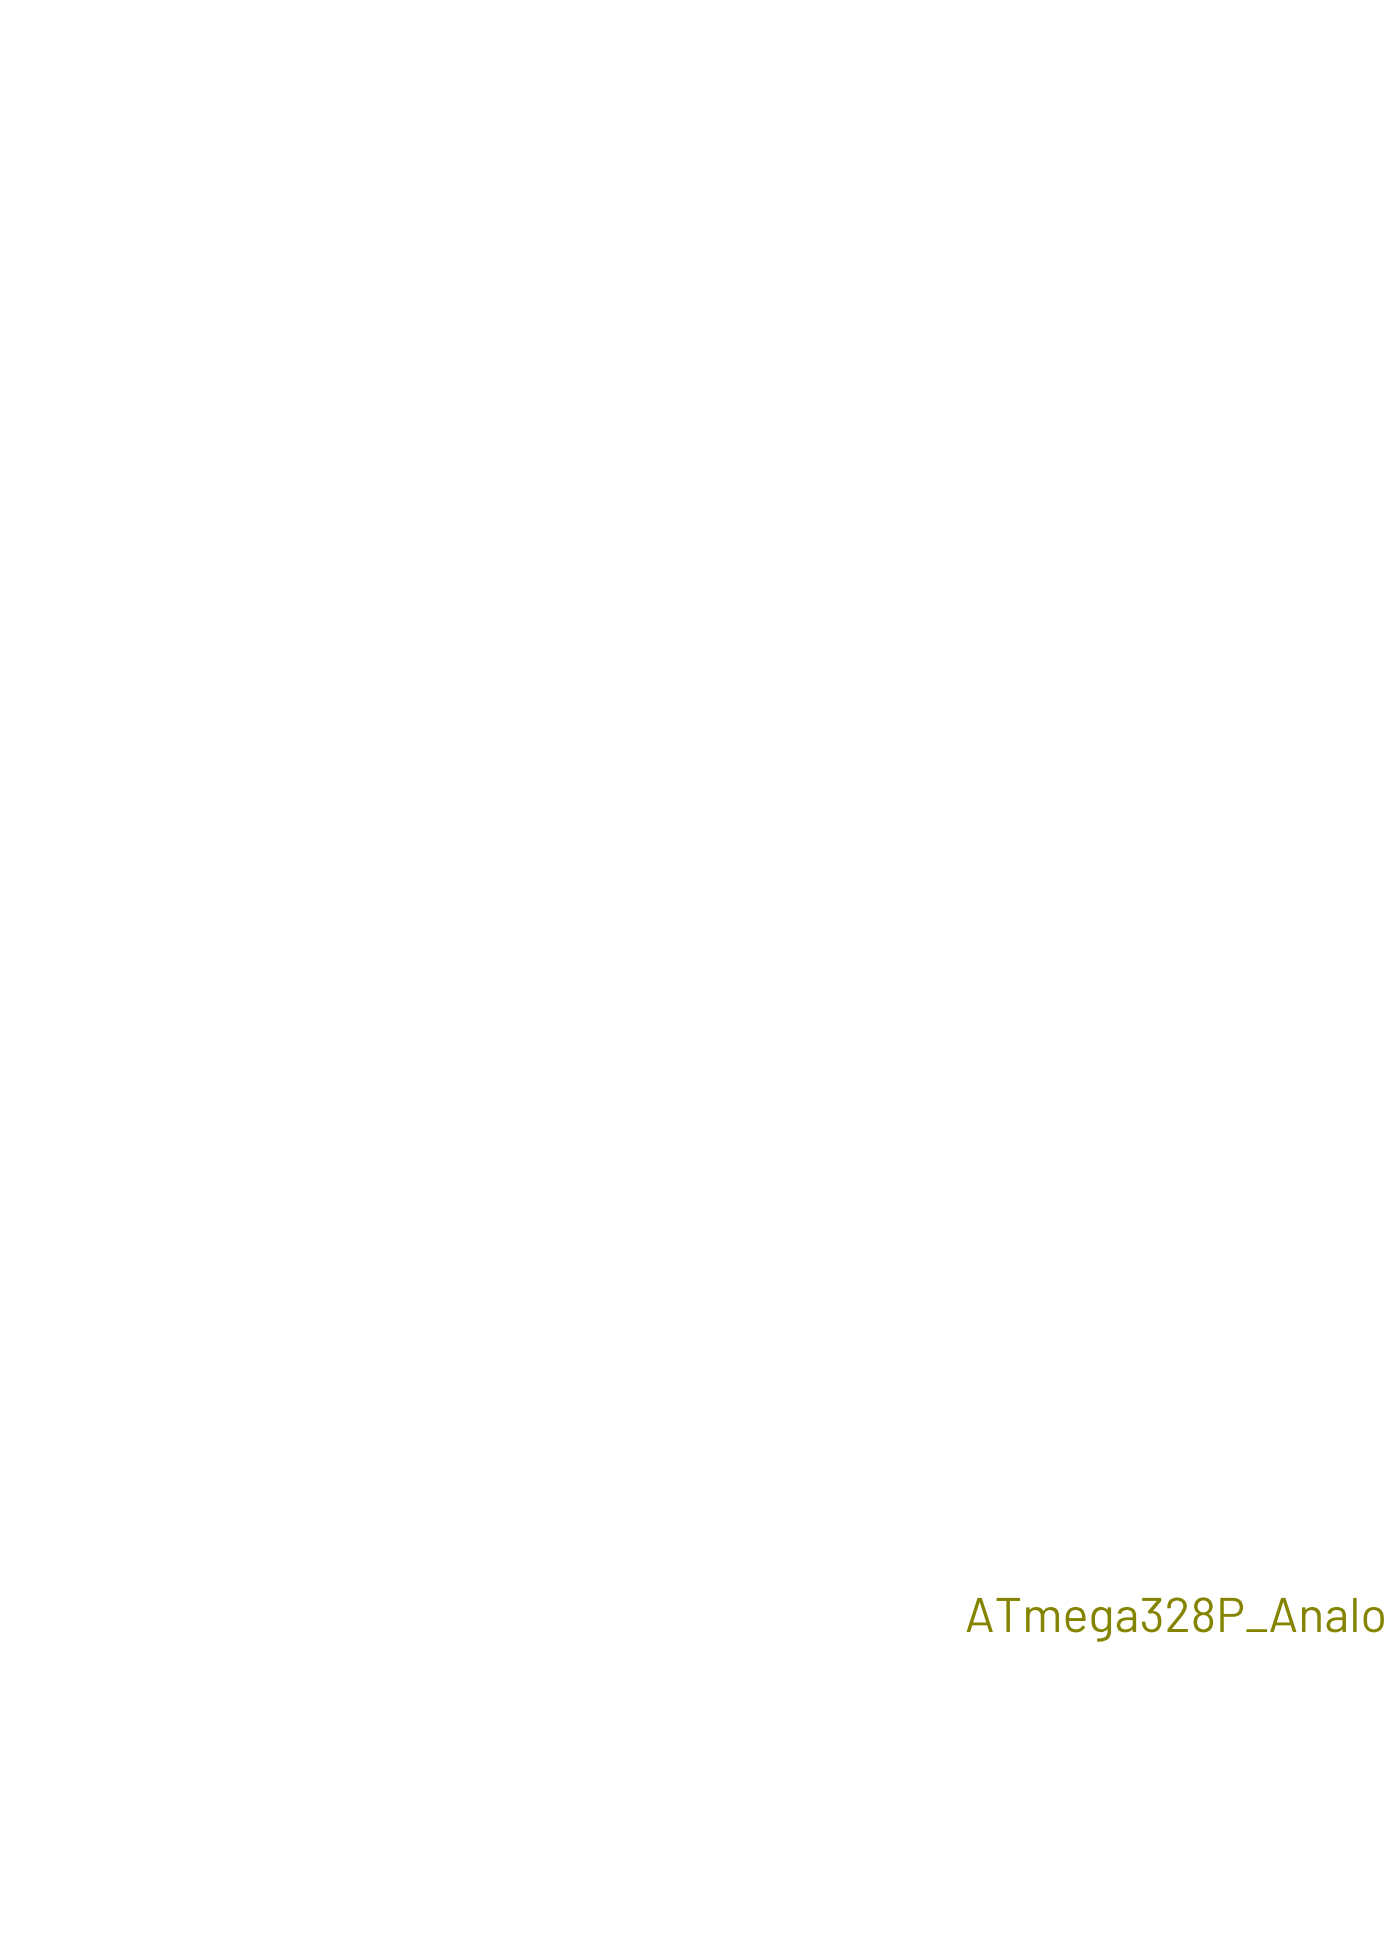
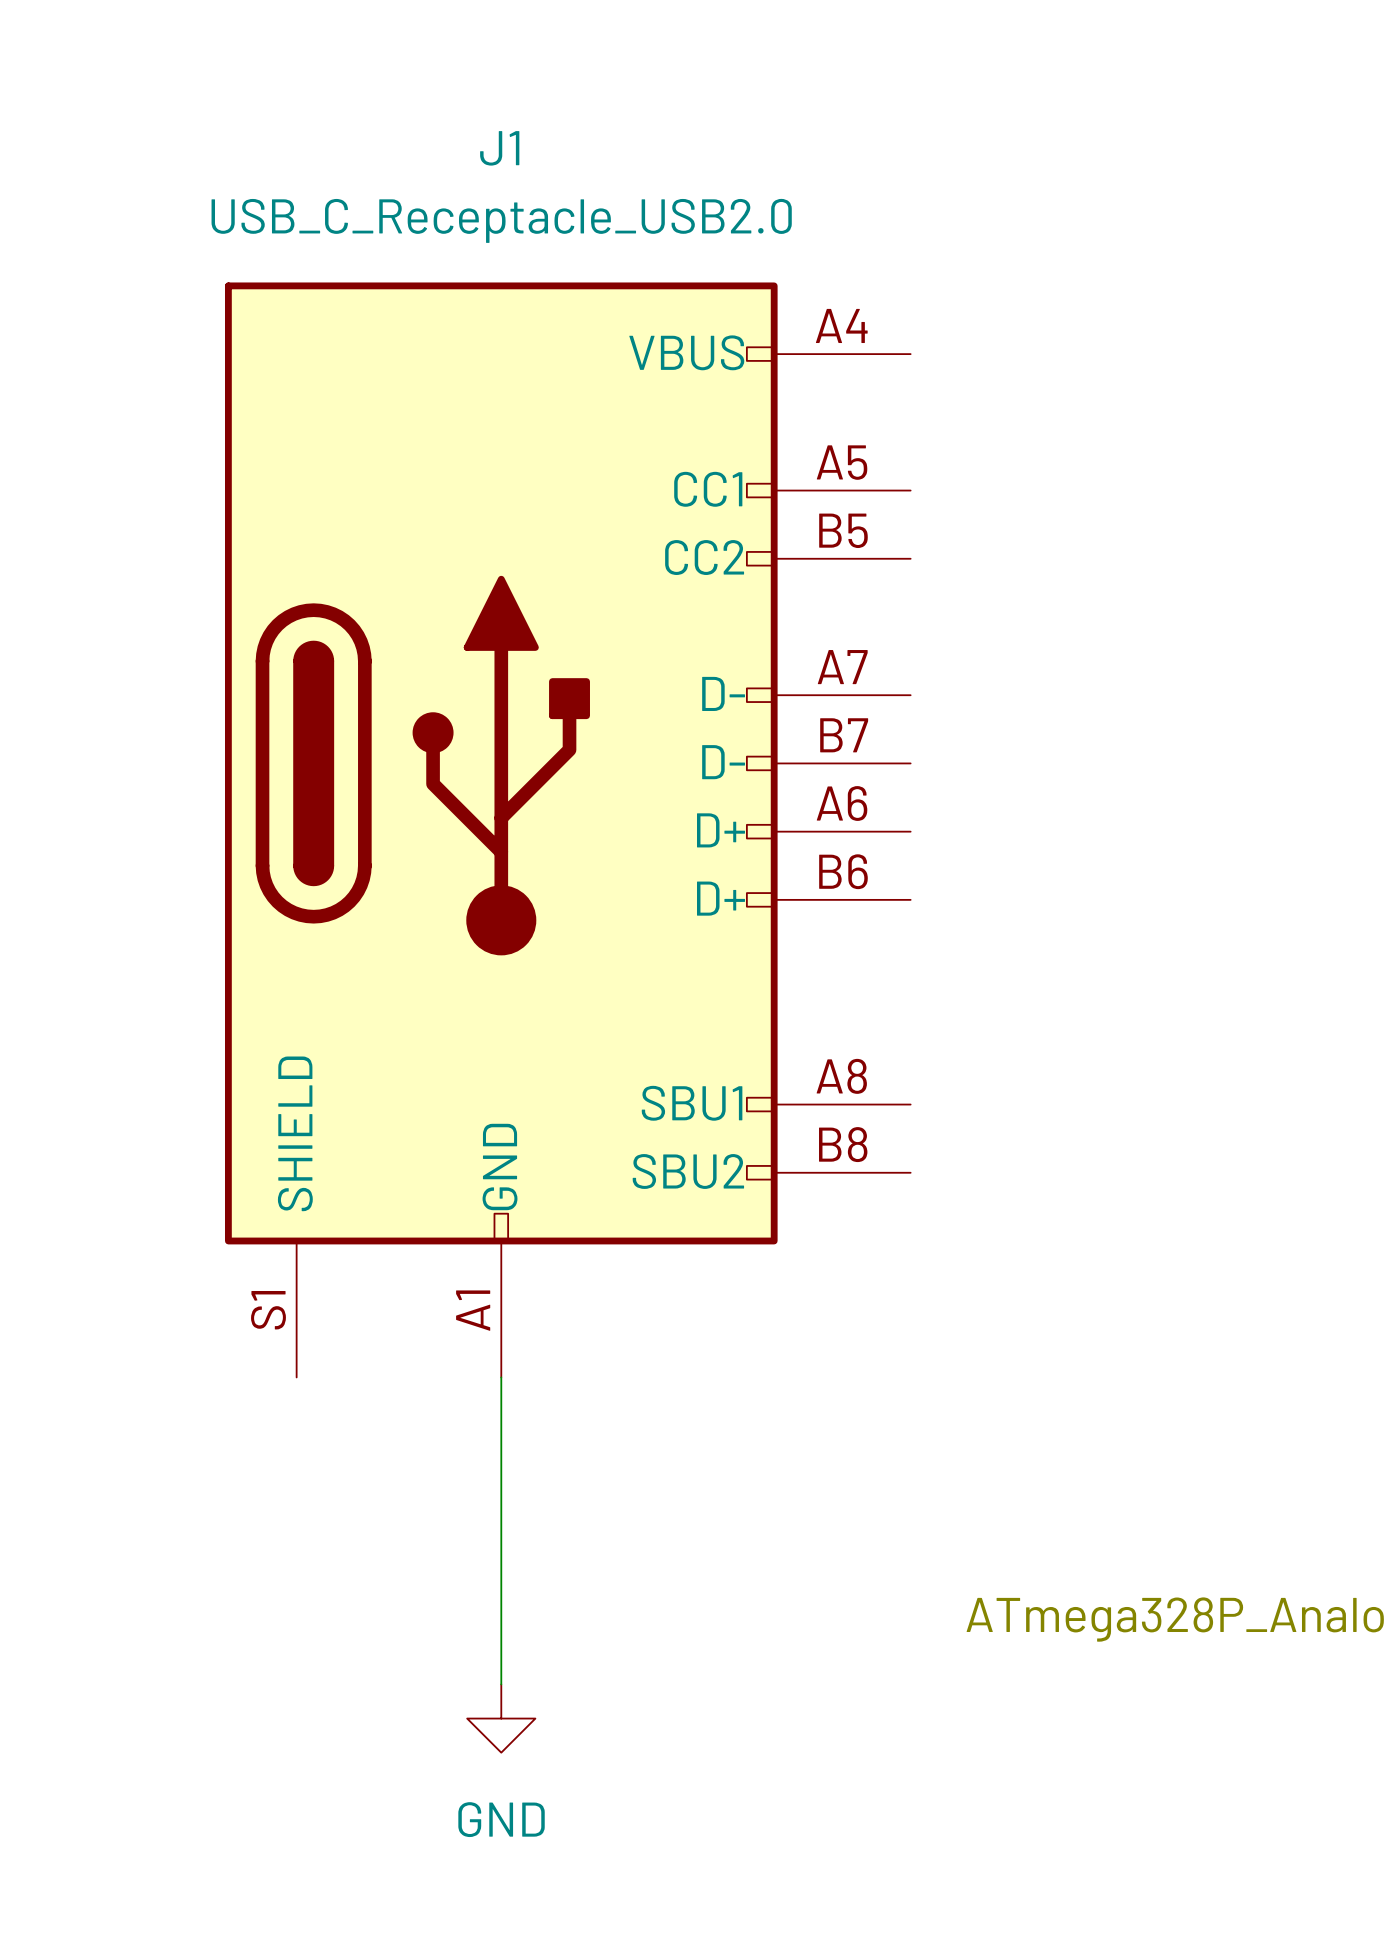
J1: none -> USB_C_Receptacle_USB2.0 (567, 829)
wire: none -> (501, 1377) (501, 1684)
power symbol: none -> GND (501, 1718)

